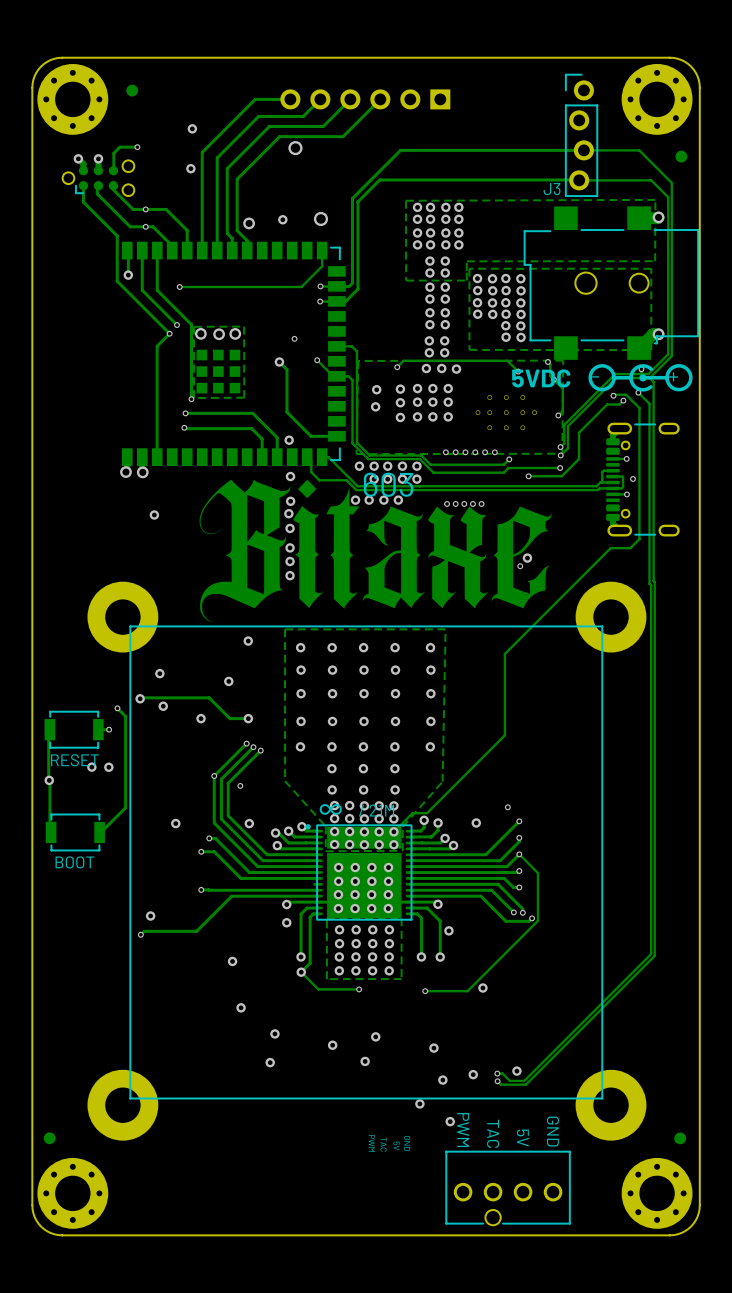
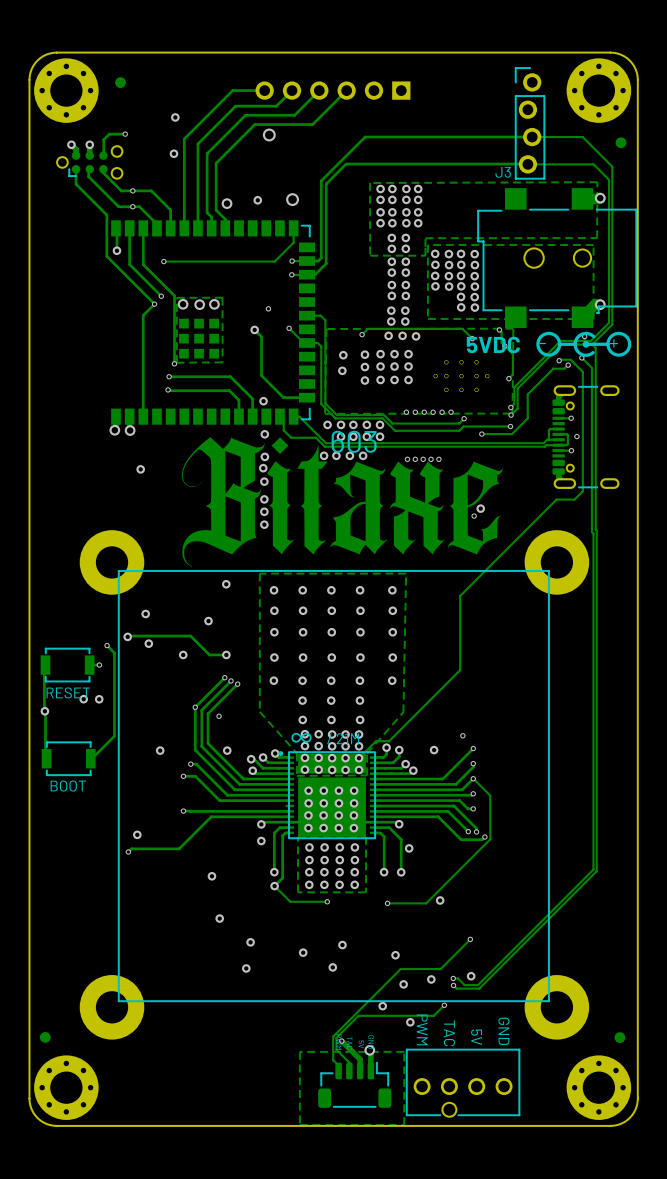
track: none -> (470, 939) (440, 969) (400, 969) (333, 1036) (333, 1060) (338, 1065)
via: none -> (470, 939)
track: none -> (444, 1005) (433, 1015) (358, 1015) (336, 1037) (336, 1049) (349, 1062) (349, 1065)
via: none -> (444, 1005)
track: none -> (341, 1041) (360, 1059) (360, 1065)
via: none -> (341, 1041)
track: none -> (369, 1050) (370, 1065)
via: none -> (369, 1050)
zone outline: none -> (404, 1051) (404, 1125) (299, 1125) (299, 1051) (404, 1051)
part: none -> (354, 1084)

